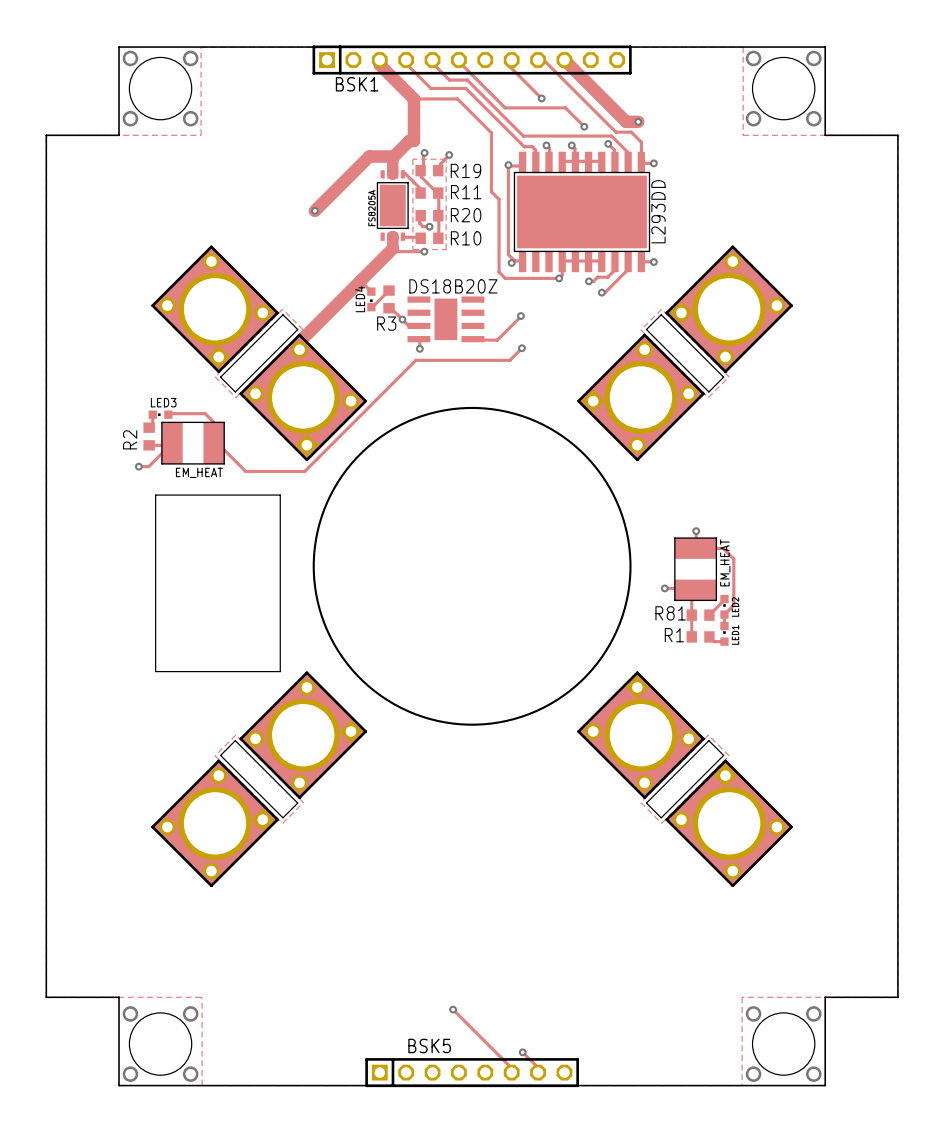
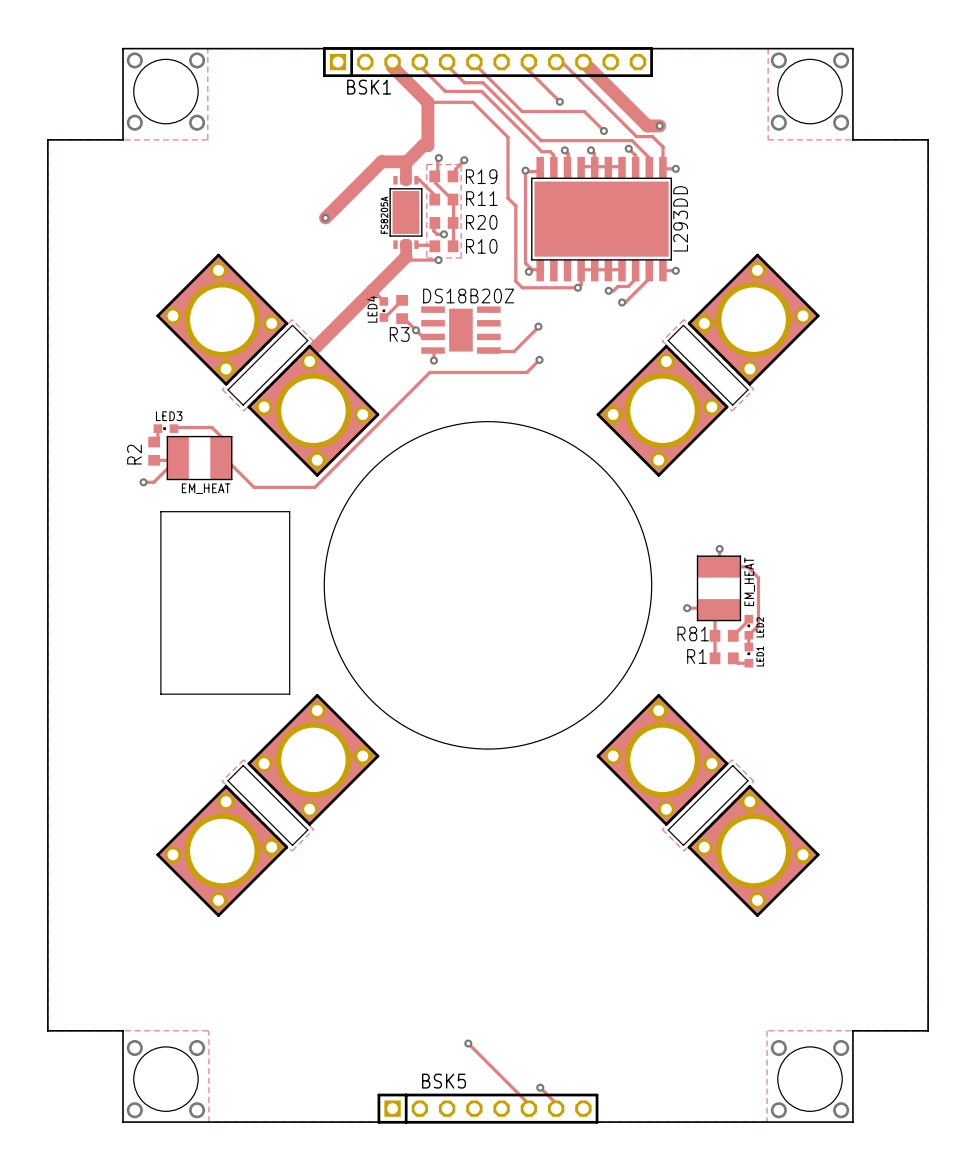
round board edge: [312, 406, 632, 726] -> none

